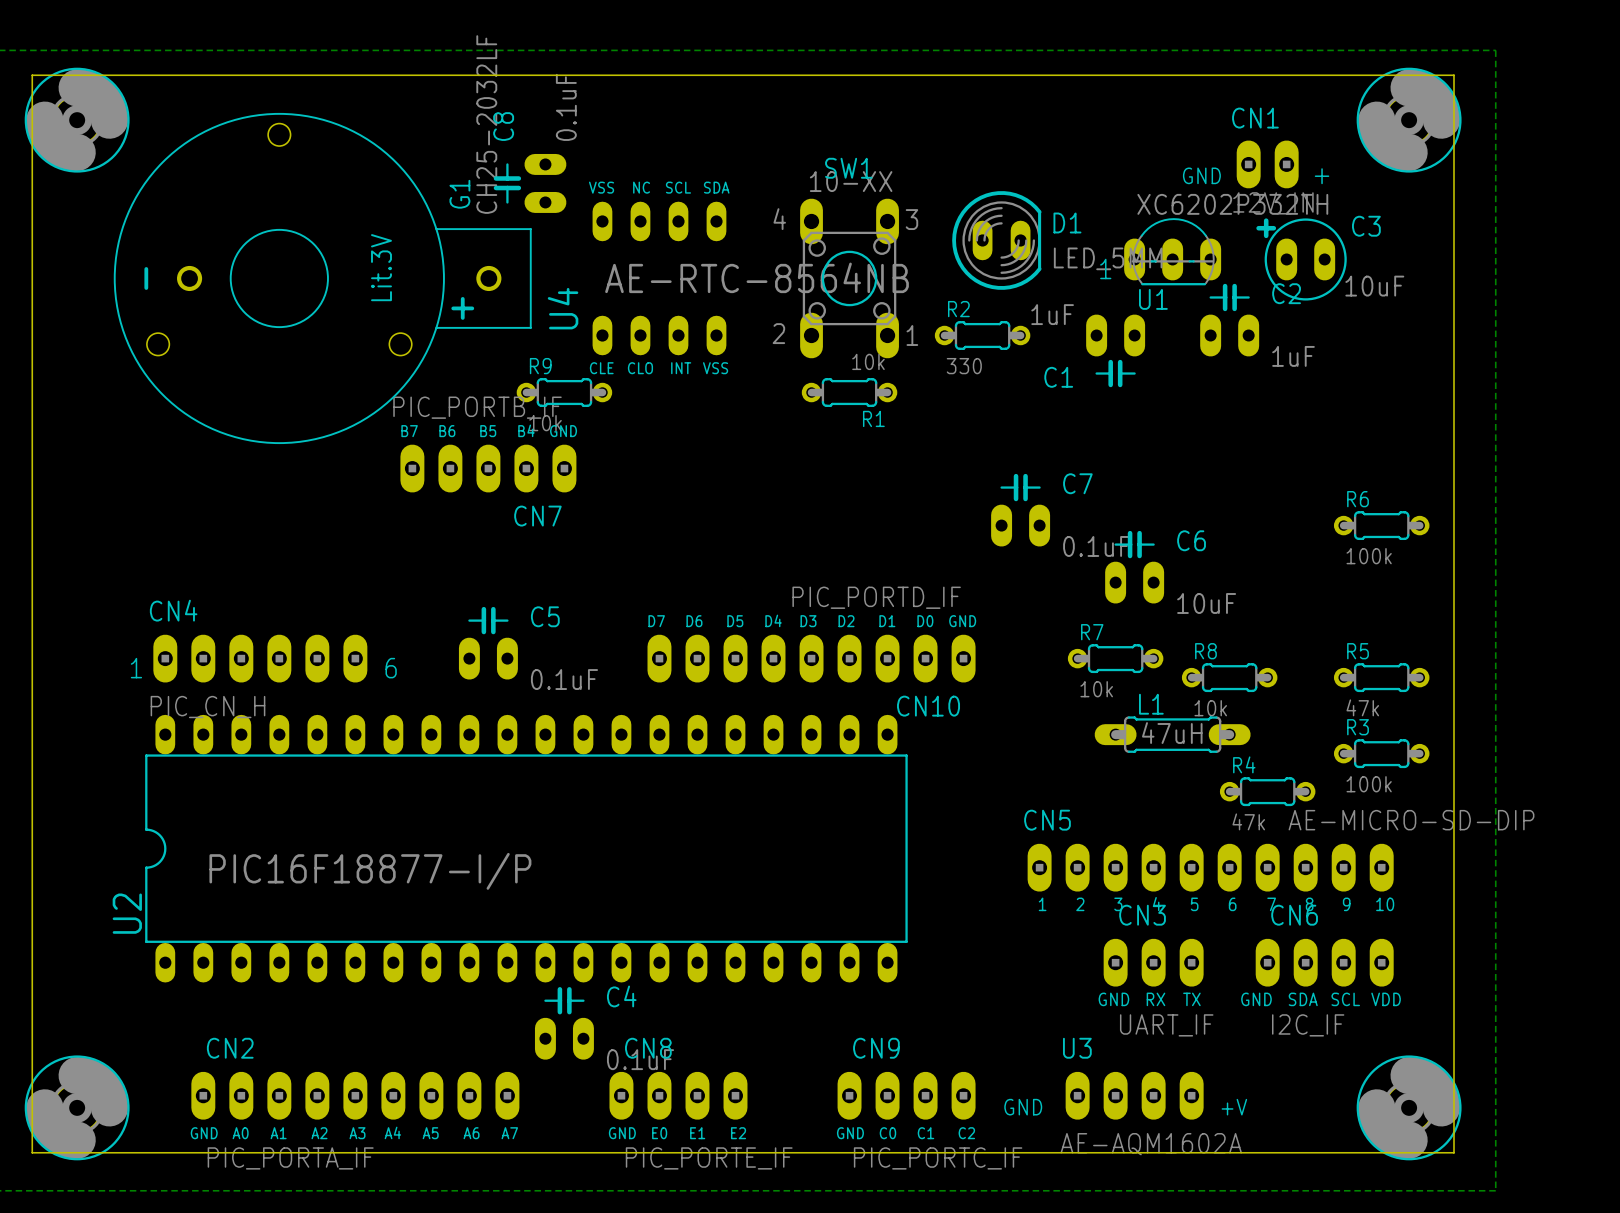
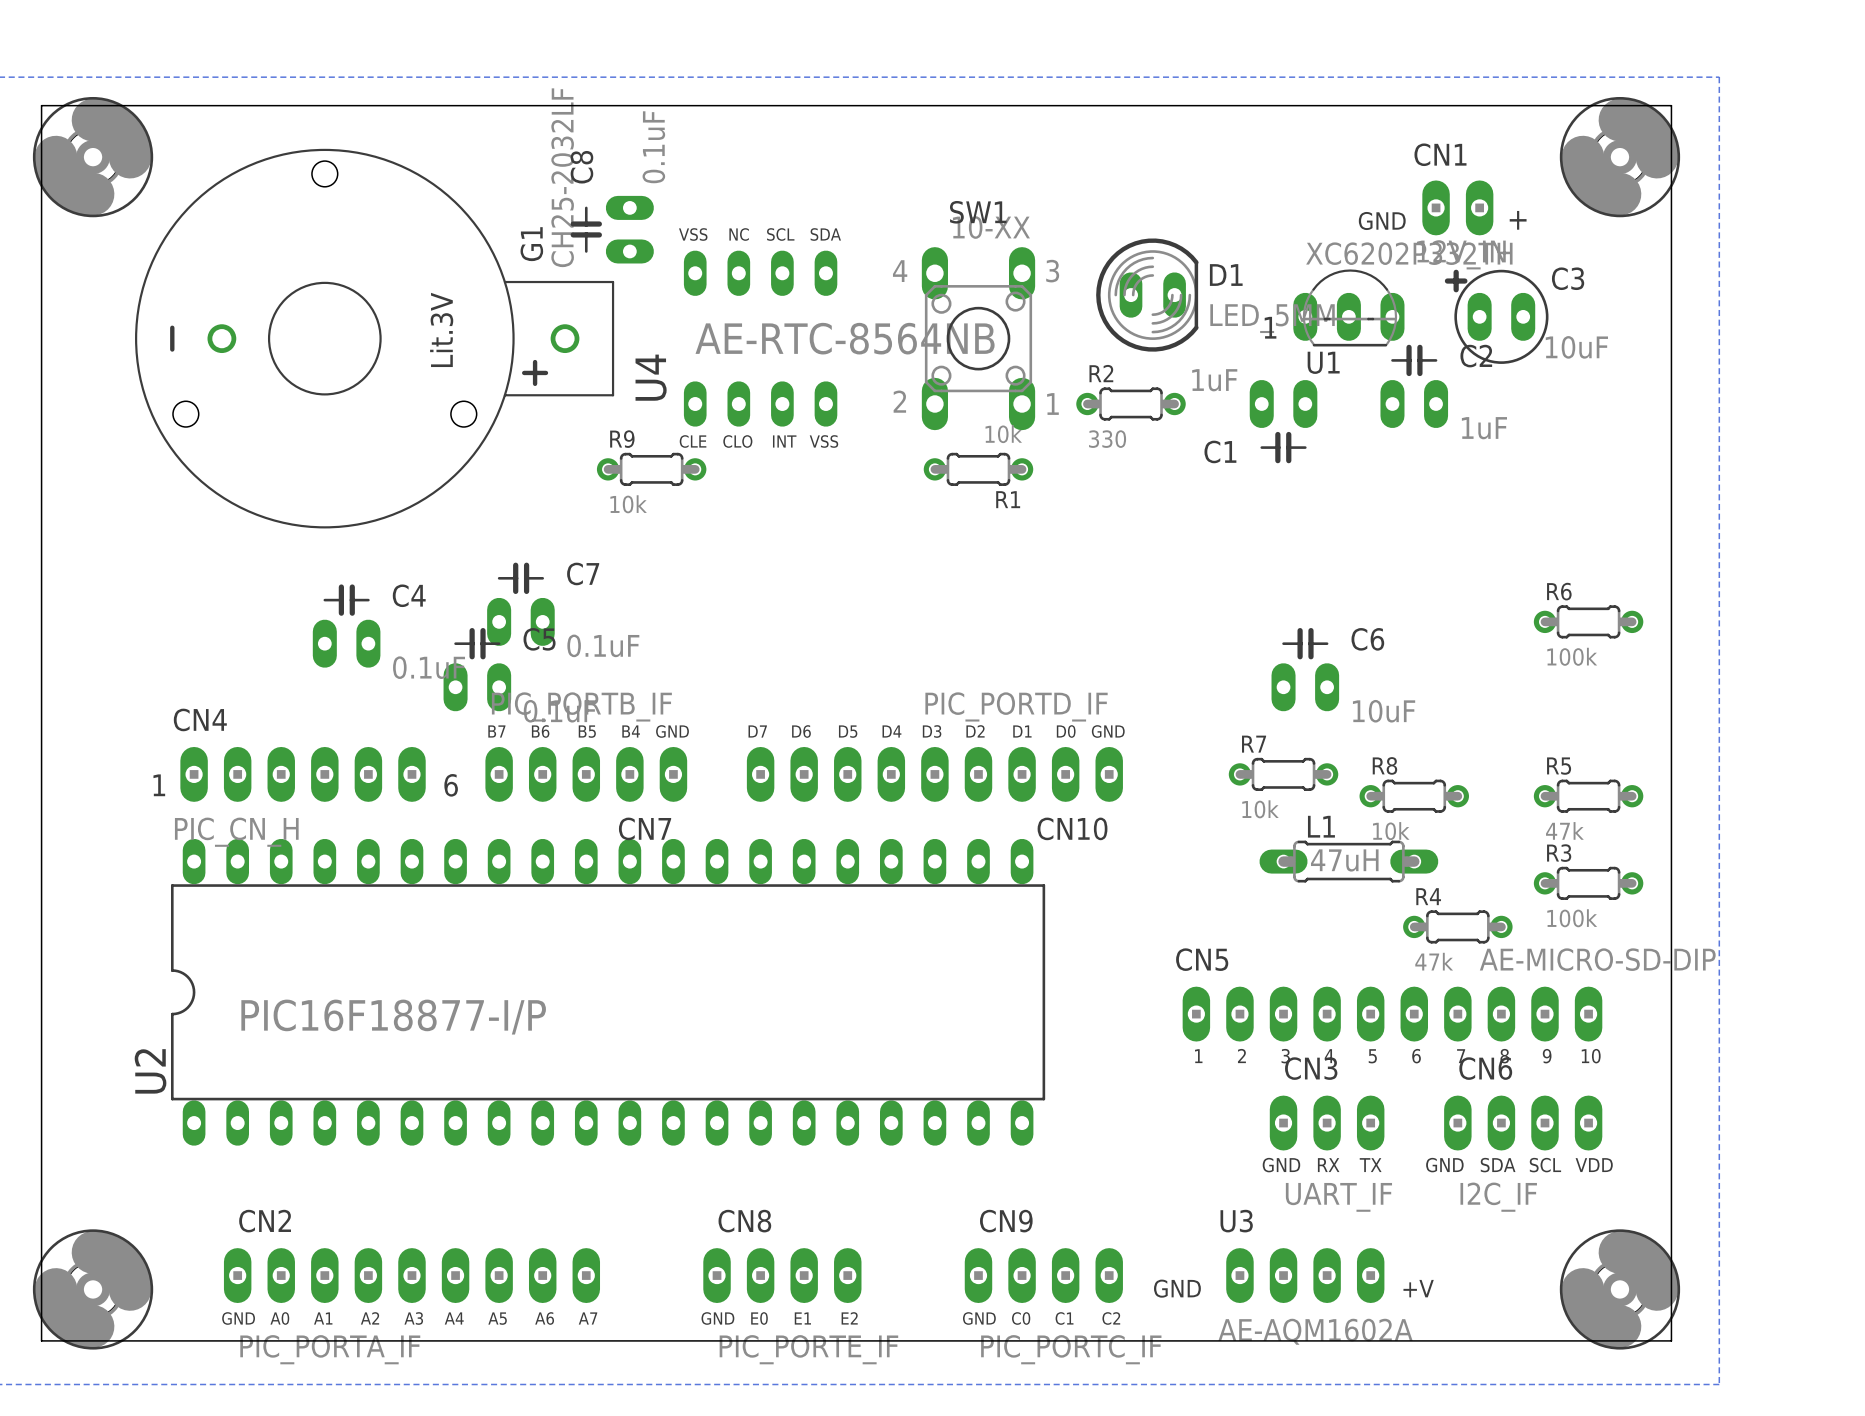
CN7 position: (488, 468) -> (586, 774)
C7 position: (1020, 510) -> (520, 604)
C5 position: (488, 643) -> (477, 669)
C4 position: (564, 1023) -> (346, 626)

